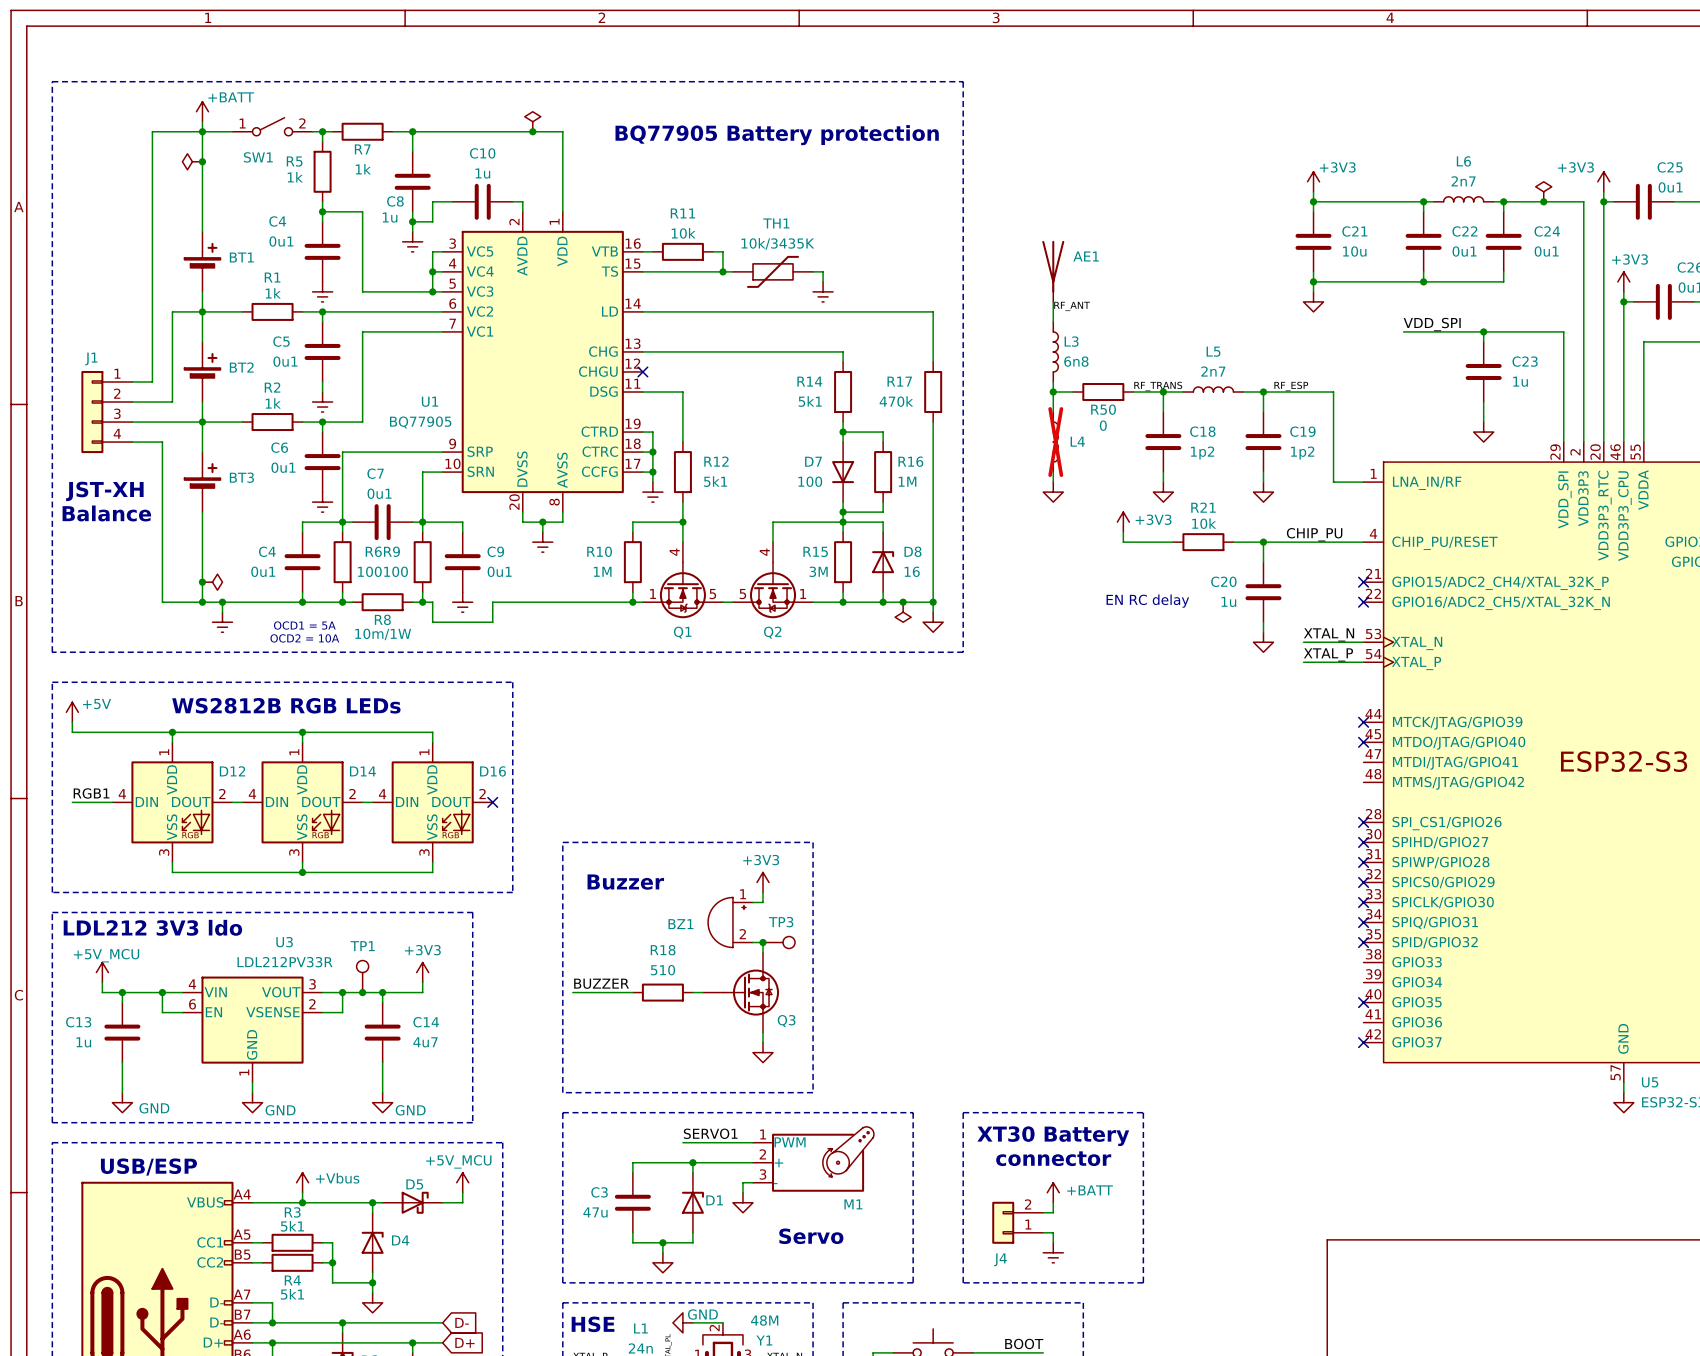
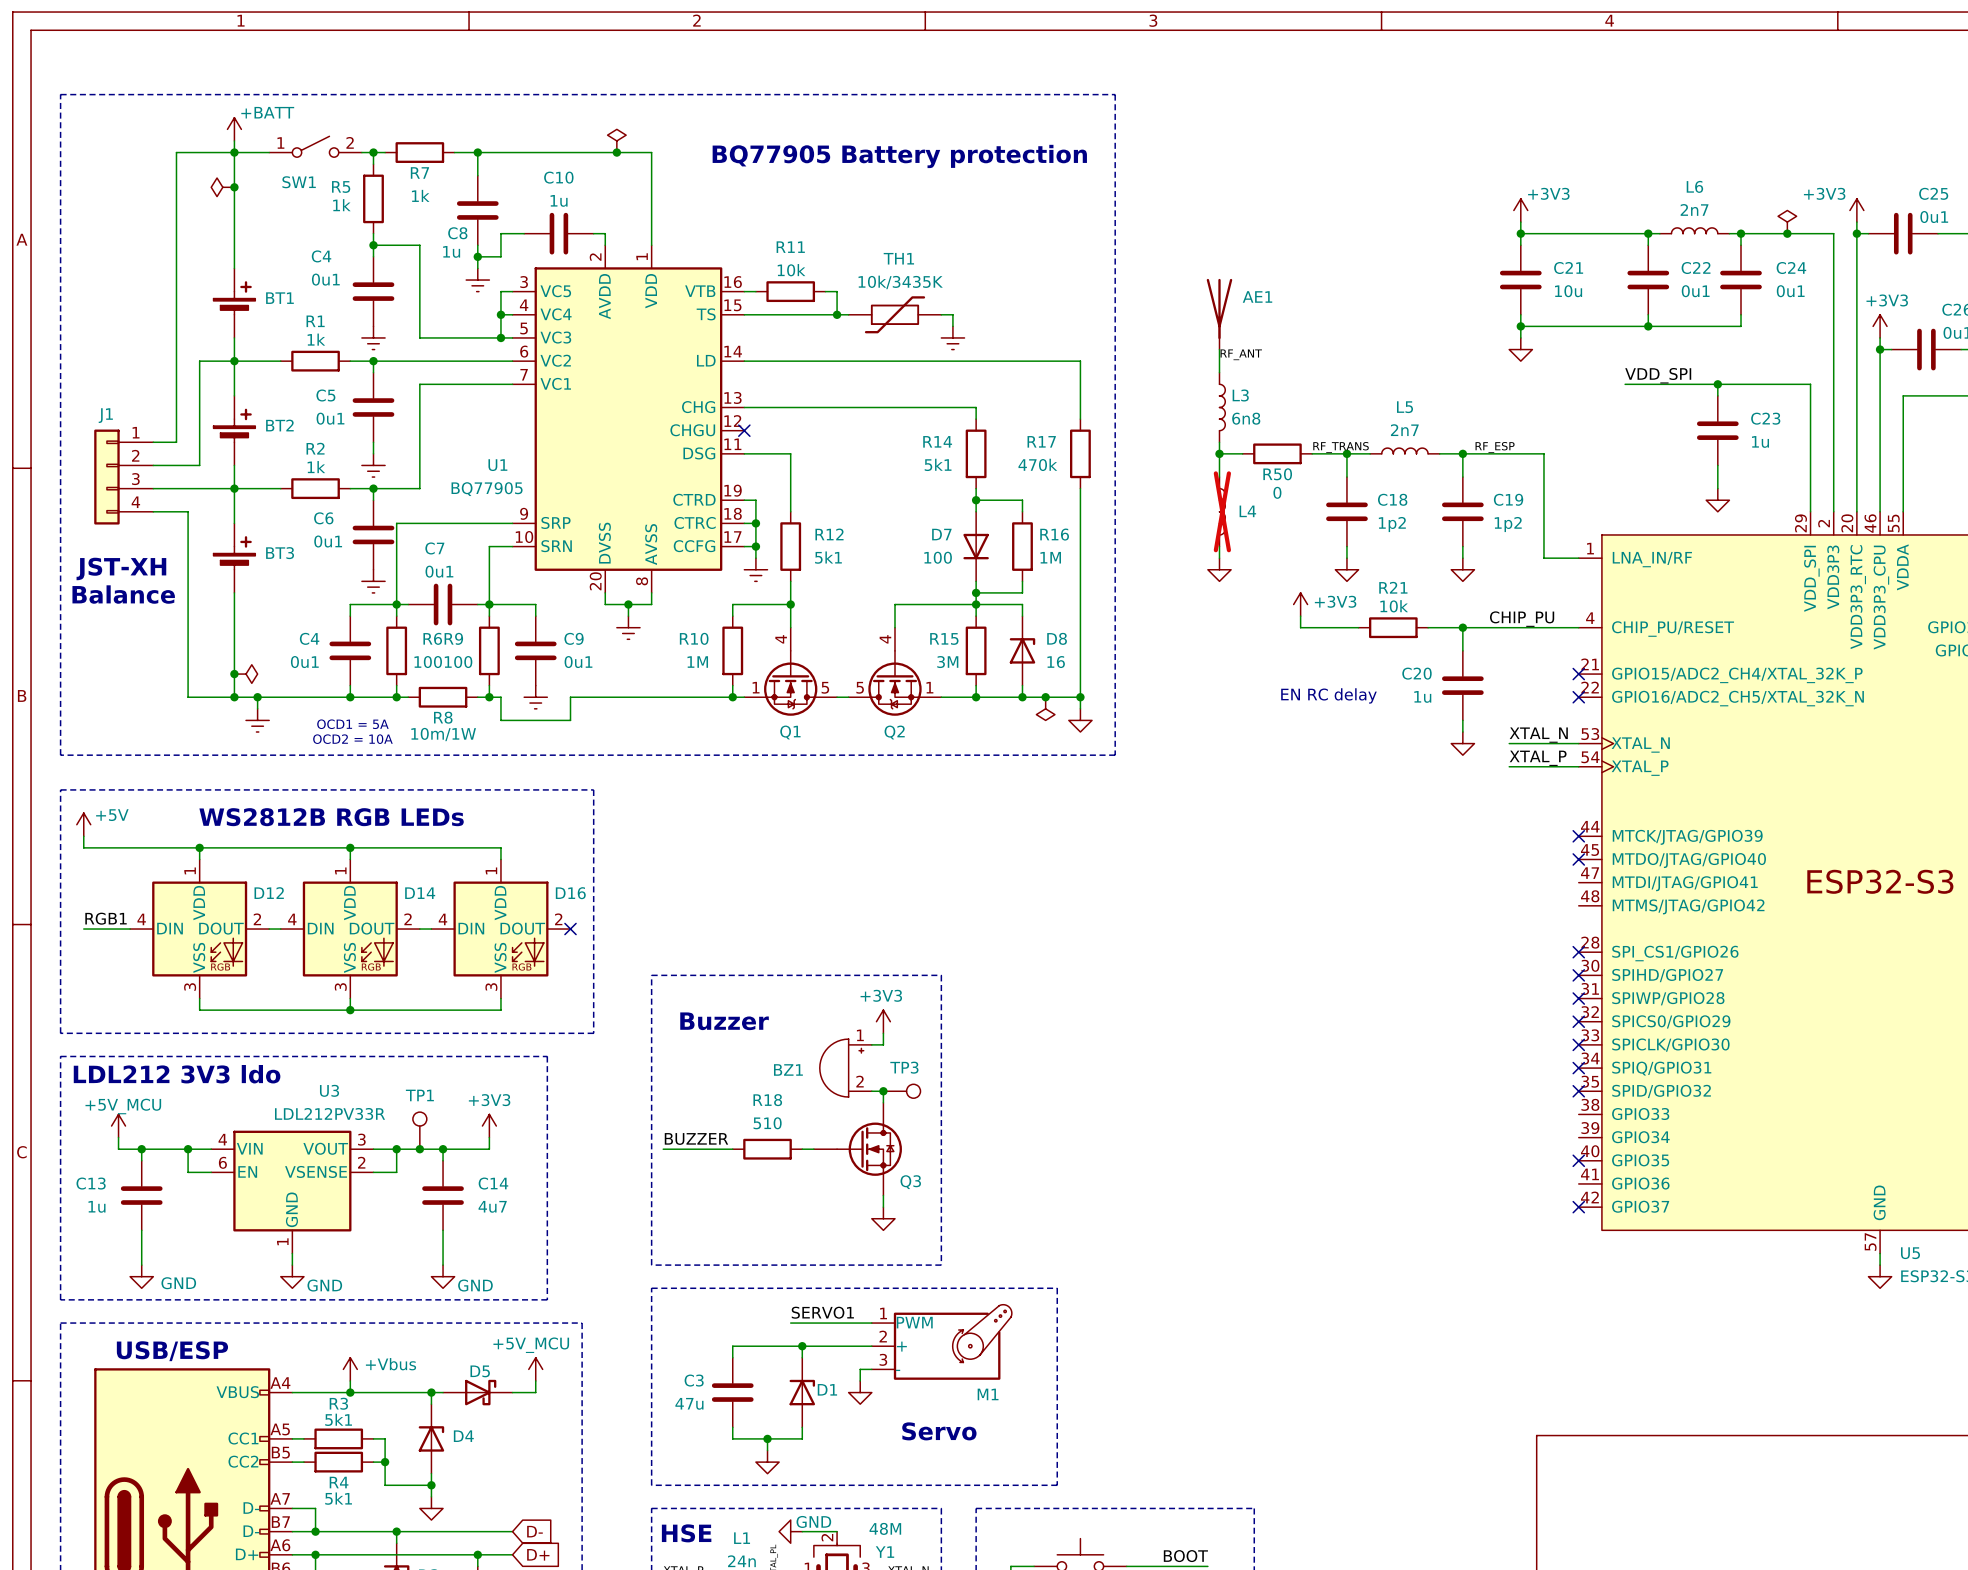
line: (963, 1112) (1143, 1112) (1143, 1282) (963, 1282) (963, 1112) -> none
text: XT30 Battery (1053, 1136) -> none
text: connector (1053, 1158) -> none
power symbol: +BATT (1053, 1192) -> none
wire: (1053, 1202) (1053, 1212) (1043, 1212) -> none
J4: (1017, 1222) -> none
wire: (1043, 1232) (1053, 1232) (1053, 1242) -> none
power symbol: (1053, 1252) -> none

